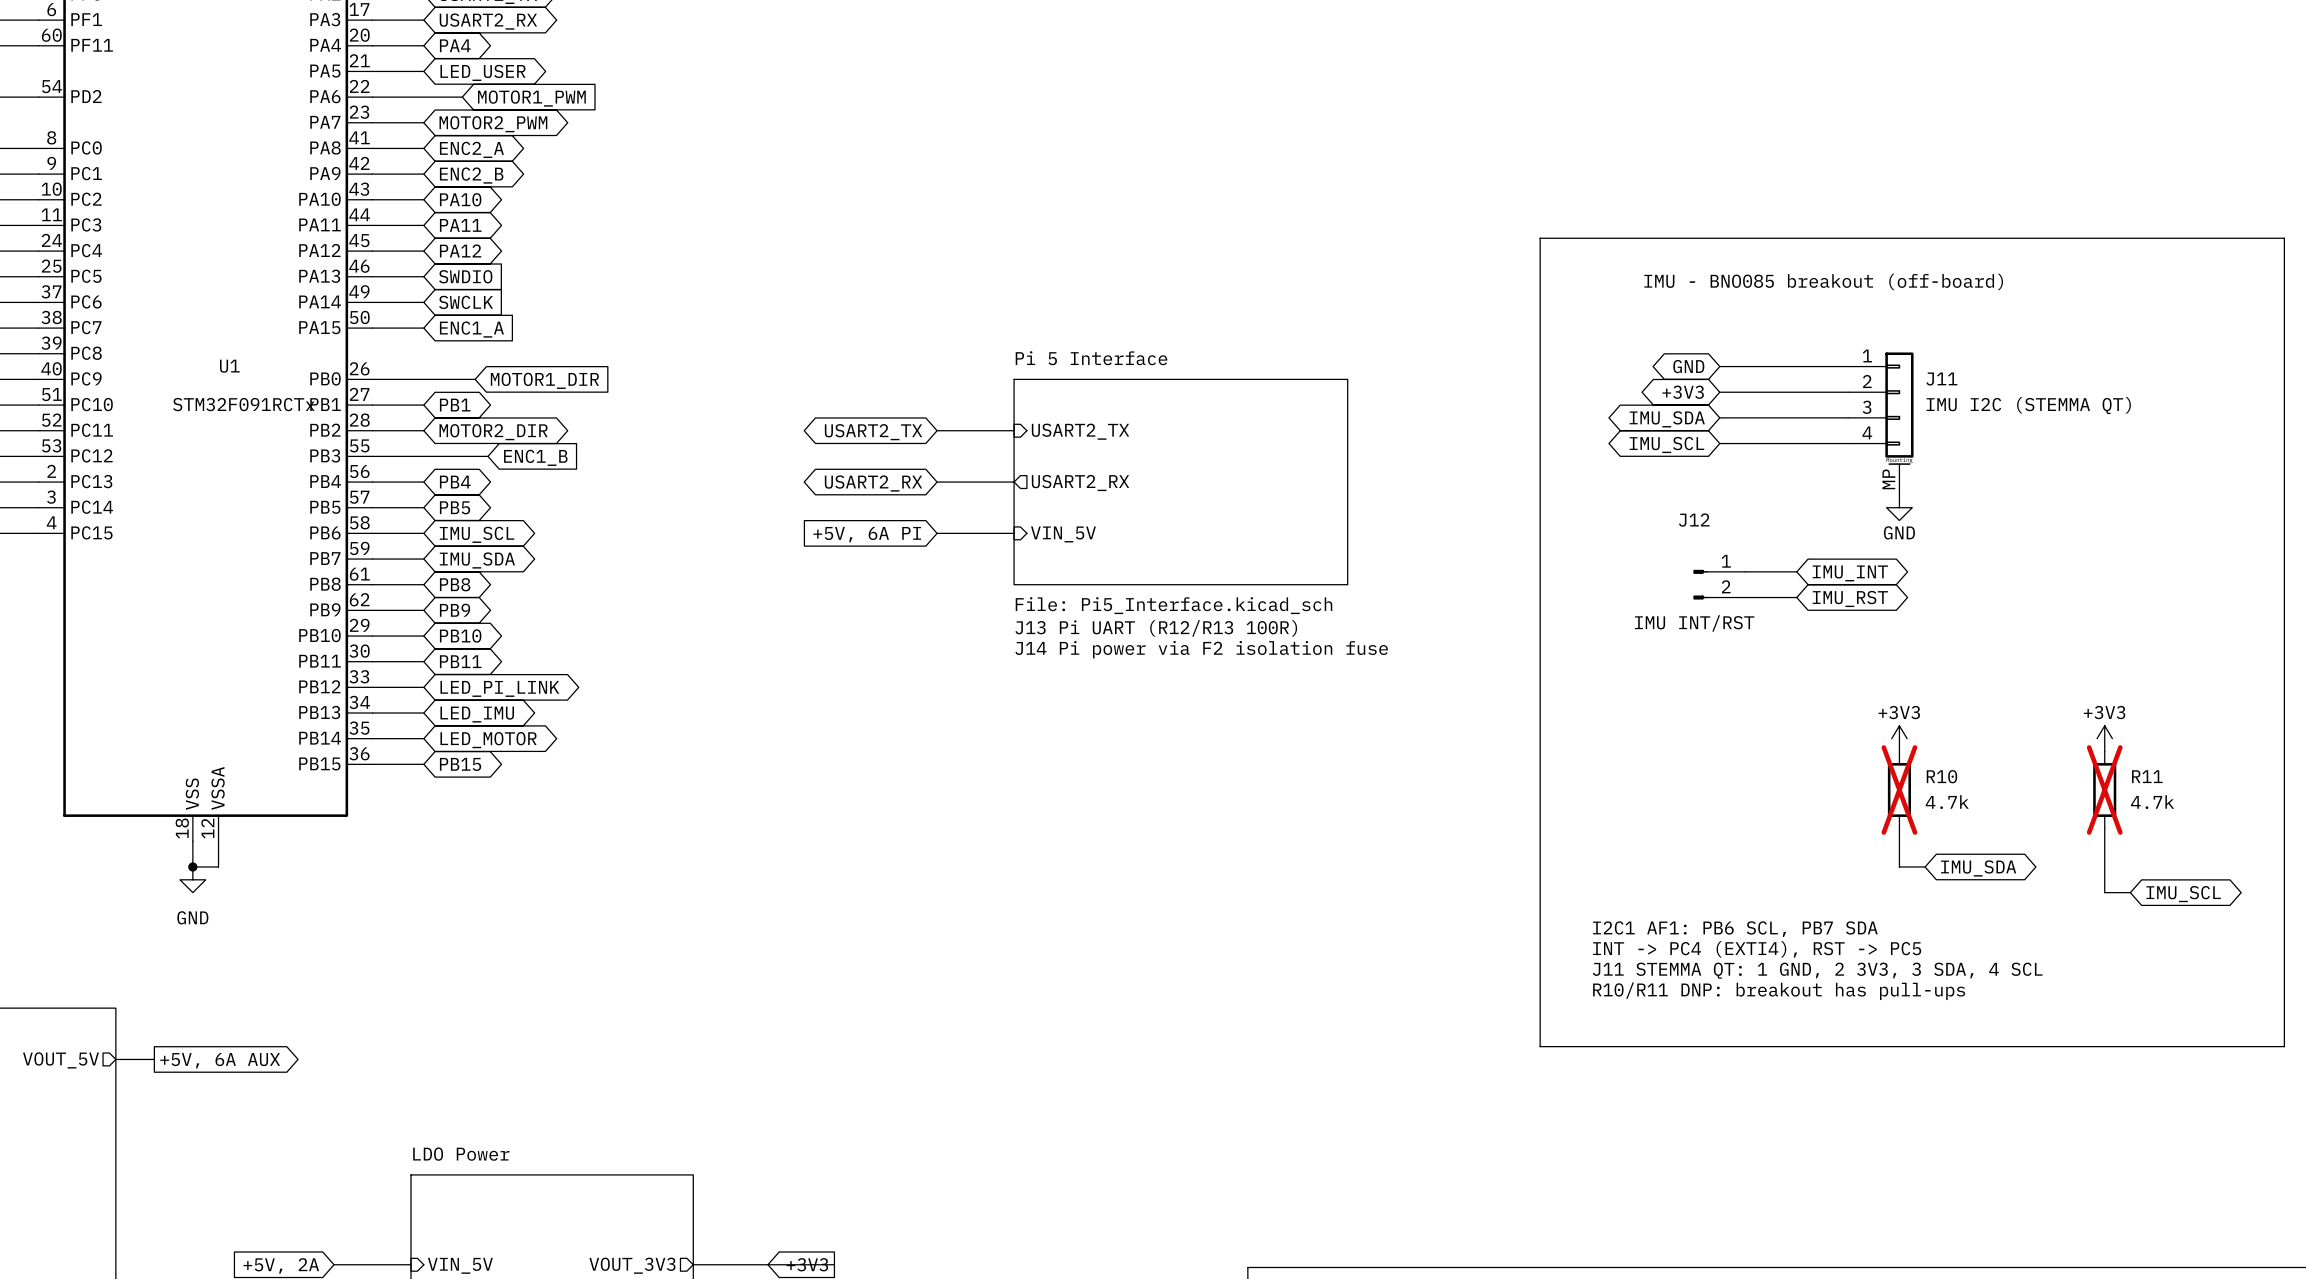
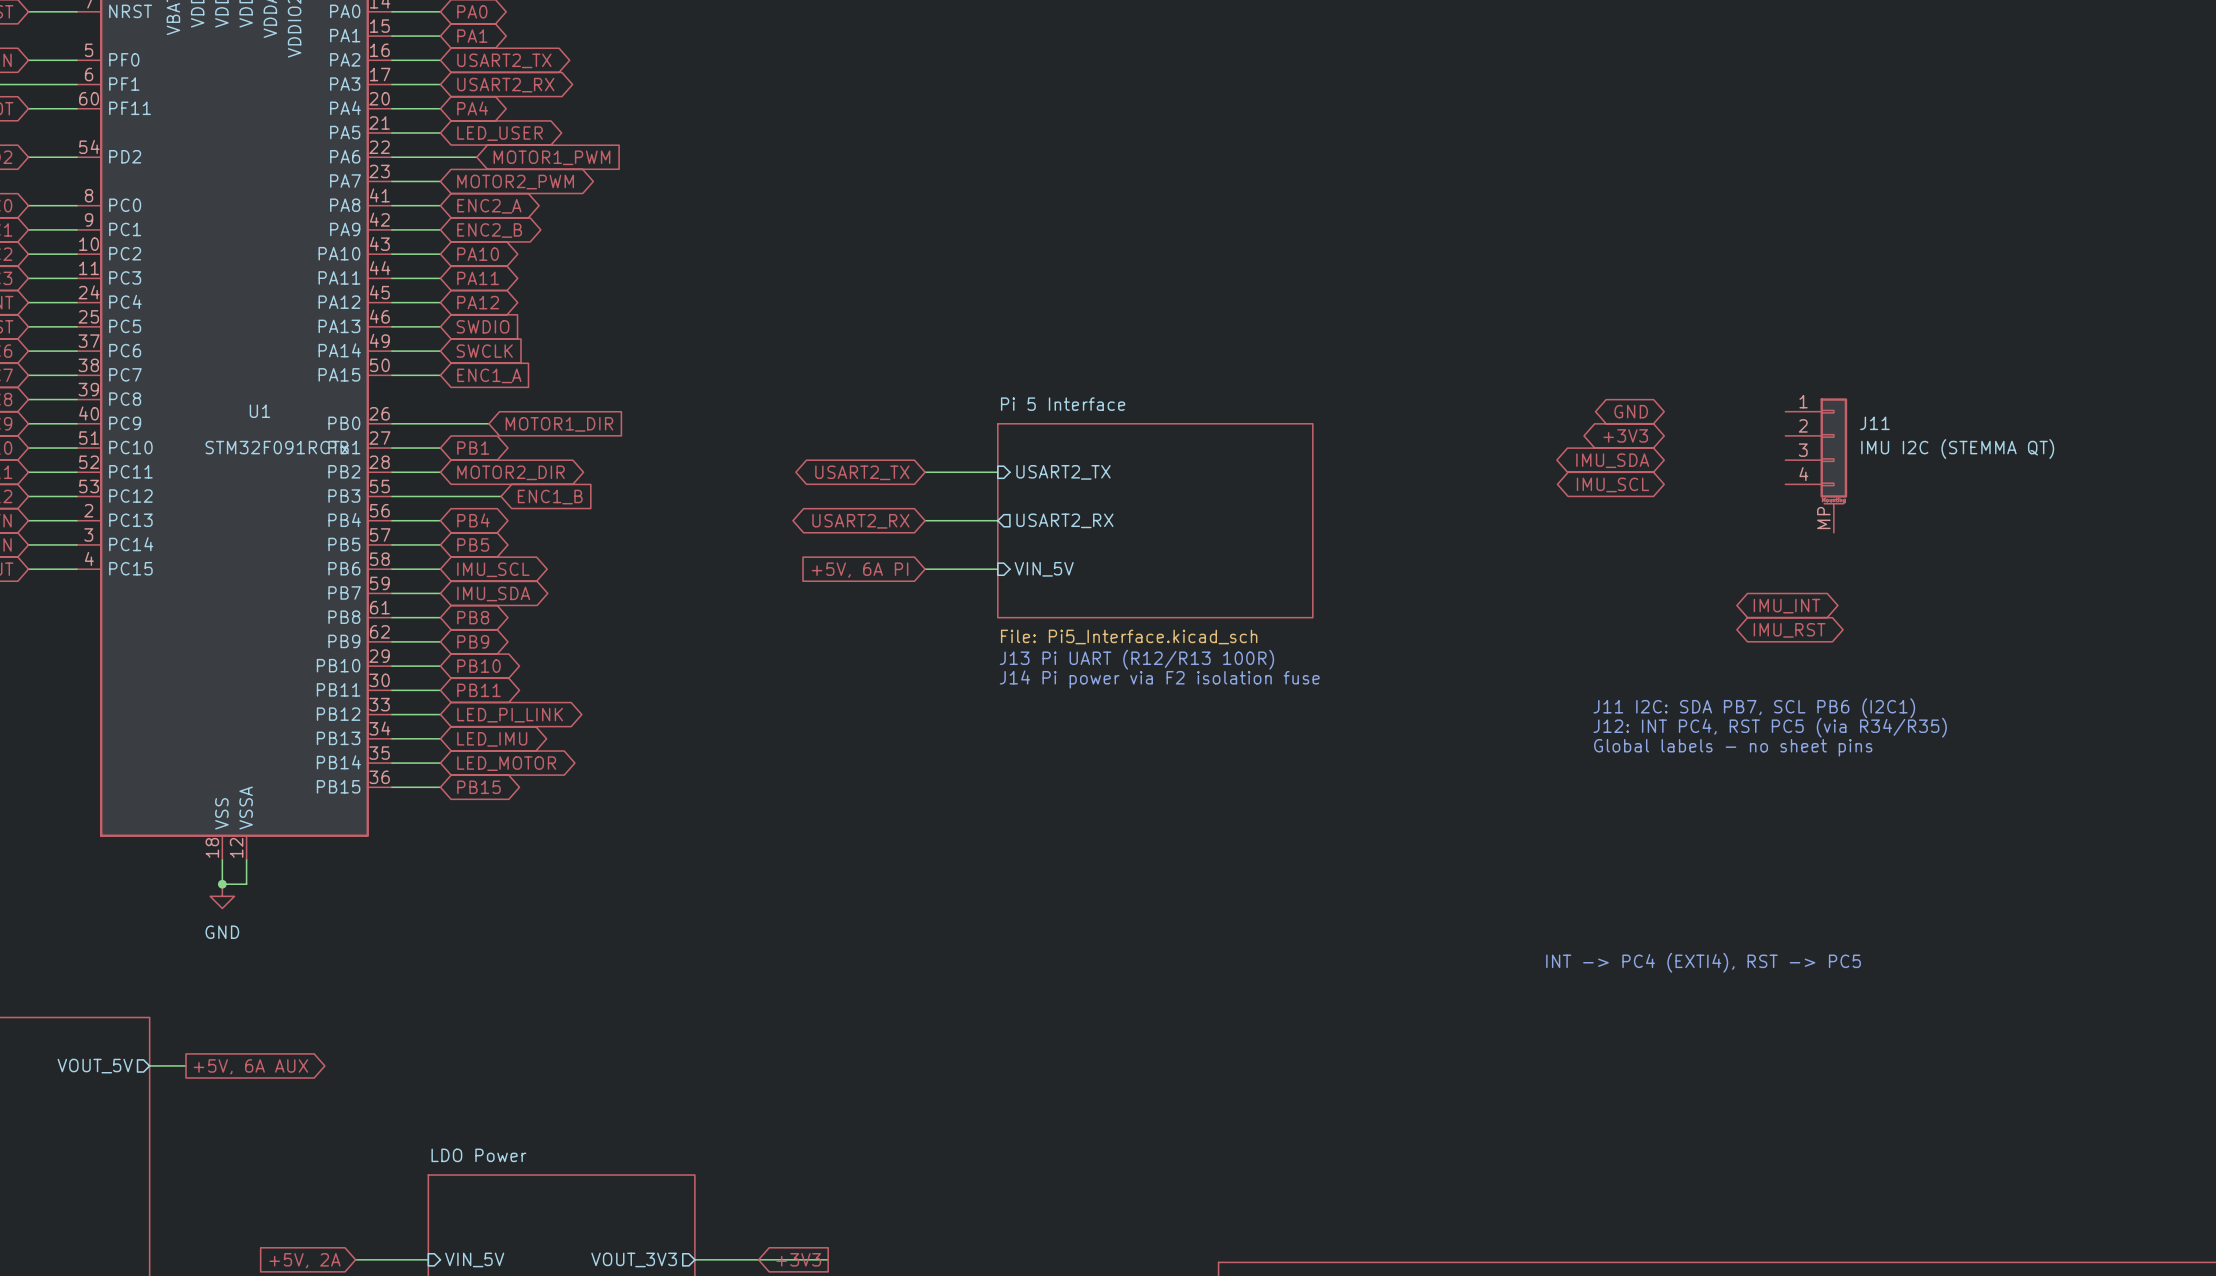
line: (1540, 238) (2284, 238) (2284, 1046) (1540, 1046) (1540, 238) -> none
text: IMU - BNO085 breakout (off-board) (1823, 281) -> none
wire: (1719, 366) (1848, 366) -> none
wire: (1719, 392) (1848, 392) -> none
wire: (1719, 417) (1848, 417) -> none
wire: (1719, 443) (1848, 443) -> none
power symbol: GND (1899, 507) -> none
wire: (1745, 571) (1796, 571) -> none
J12: IMU INT/RST (1719, 584) -> none
wire: (1745, 597) (1796, 597) -> none
text: none -> J11 I2C: SDA PB7, SCL PB6 (I2C1) (1754, 708)
text: none -> J12: INT PC4, RST PC5 (via R34/R35) (1770, 727)
text: none -> Global labels - no sheet pins (1733, 747)
power symbol: +3V3 (1899, 738) -> none
power symbol: +3V3 (2104, 738) -> none
R10: 4.7k (1899, 790) -> none
R11: 4.7k (2104, 790) -> none
wire: (1899, 828) (1899, 866) (1925, 866) -> none
wire: (2104, 828) (2104, 892) (2130, 892) -> none
global label: IMU_SDA (1978, 868) -> none
global label: IMU_SCL (2183, 894) -> none
text: I2C1 AF1: PB6 SCL, PB7 SDA (1735, 929) -> none
text: J11 STEMMA QT: 1 GND, 2 3V3, 3 SDA, 4 SCL (1817, 970) -> none
text: R10/R11 DNP: breakout has pull-ups (1779, 991) -> none

